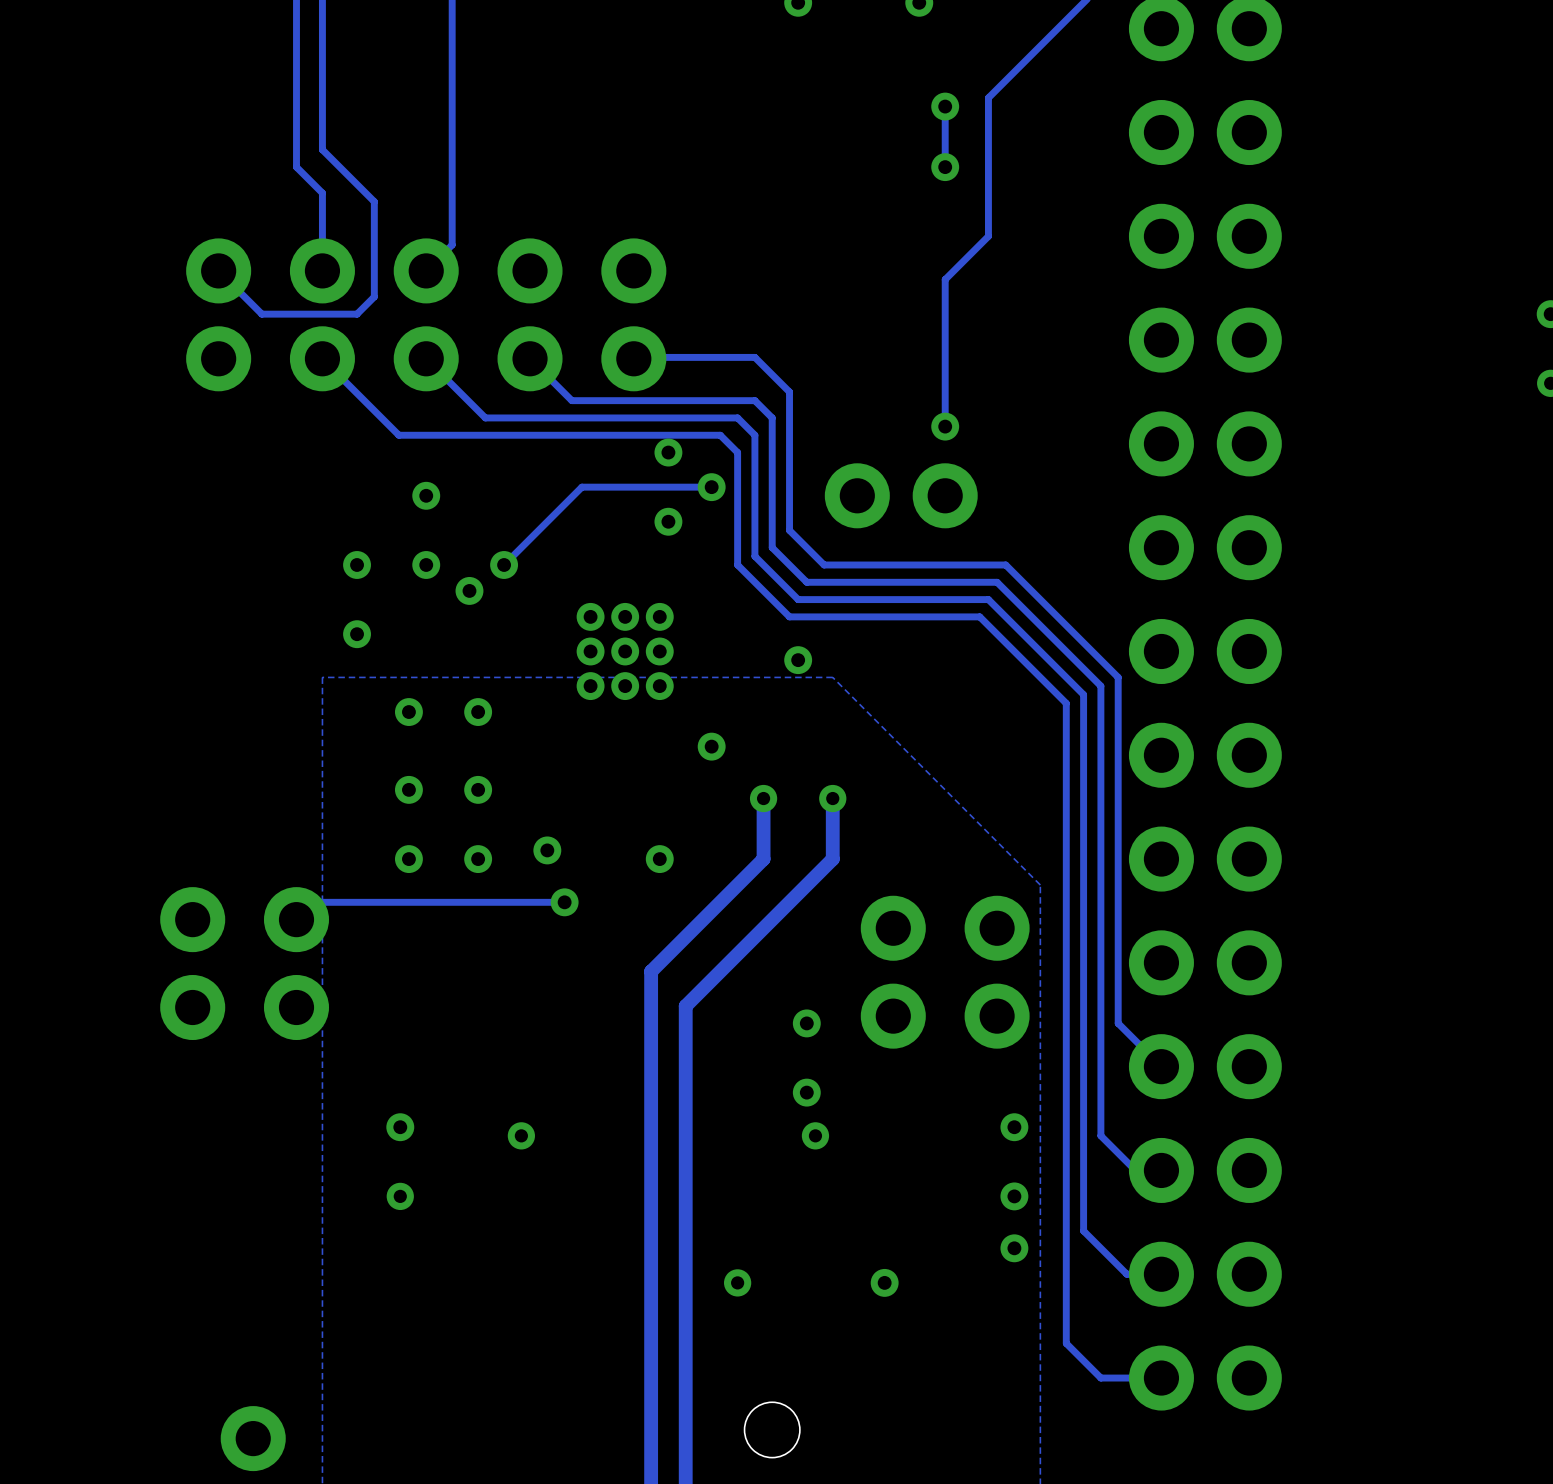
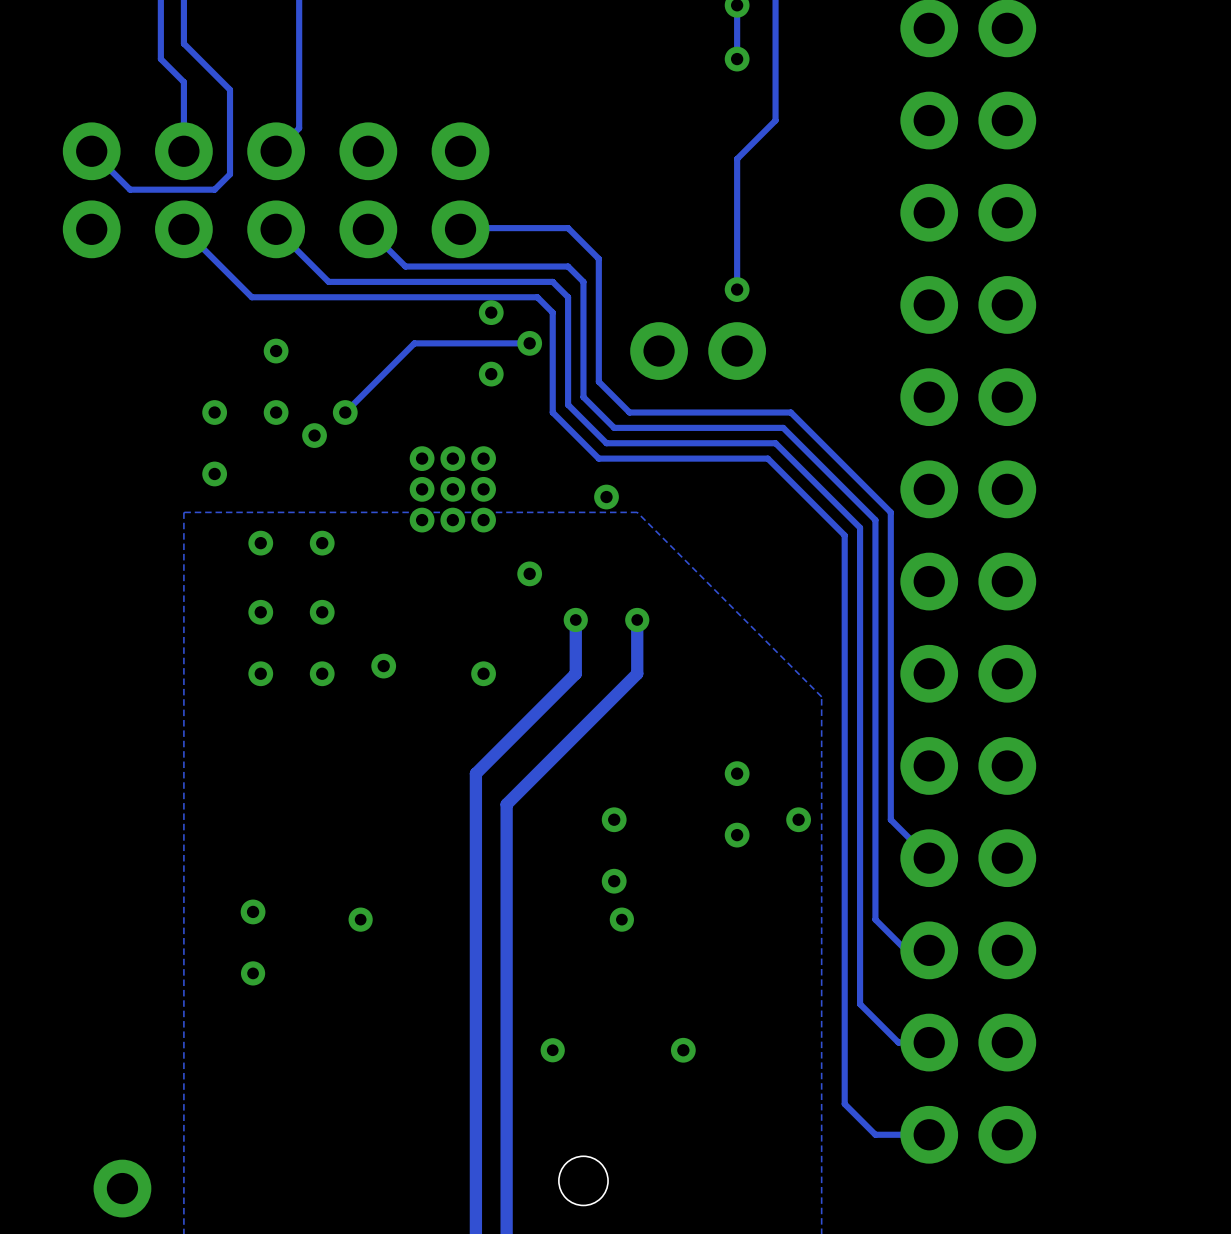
track: (564, 902) (313, 902) (296, 919) -> none
via: (564, 902) -> none
part: (192, 963) -> none
part: (296, 963) -> none
via: none -> (737, 773)
part: (893, 972) -> none
part: (997, 972) -> none
via: none -> (798, 819)
via: none -> (737, 835)
via: (1014, 1127) -> none
via: (1014, 1196) -> none
via: (1014, 1248) -> none

